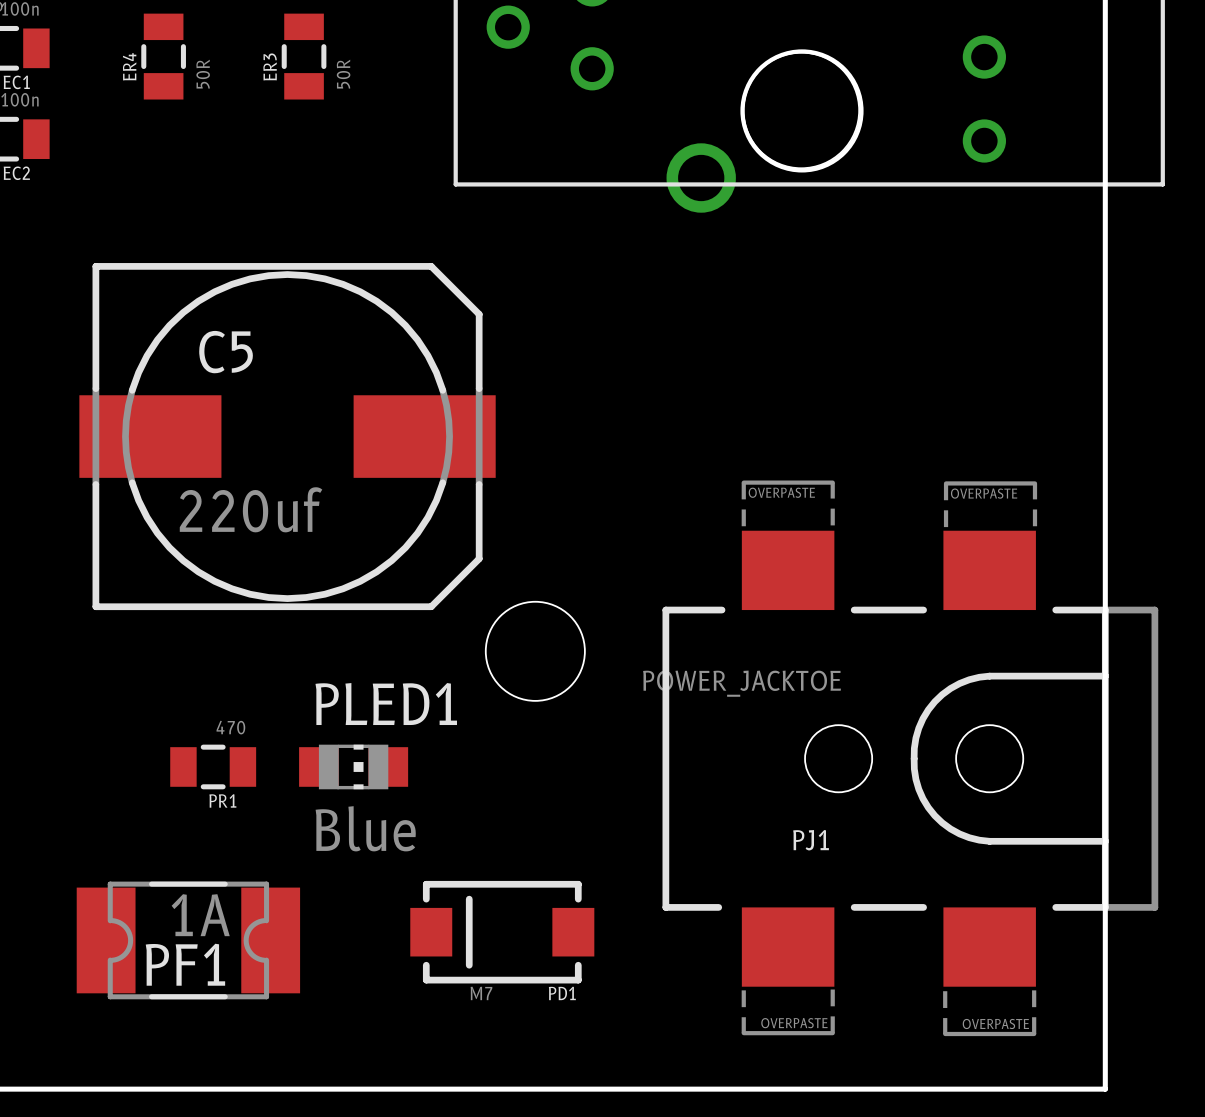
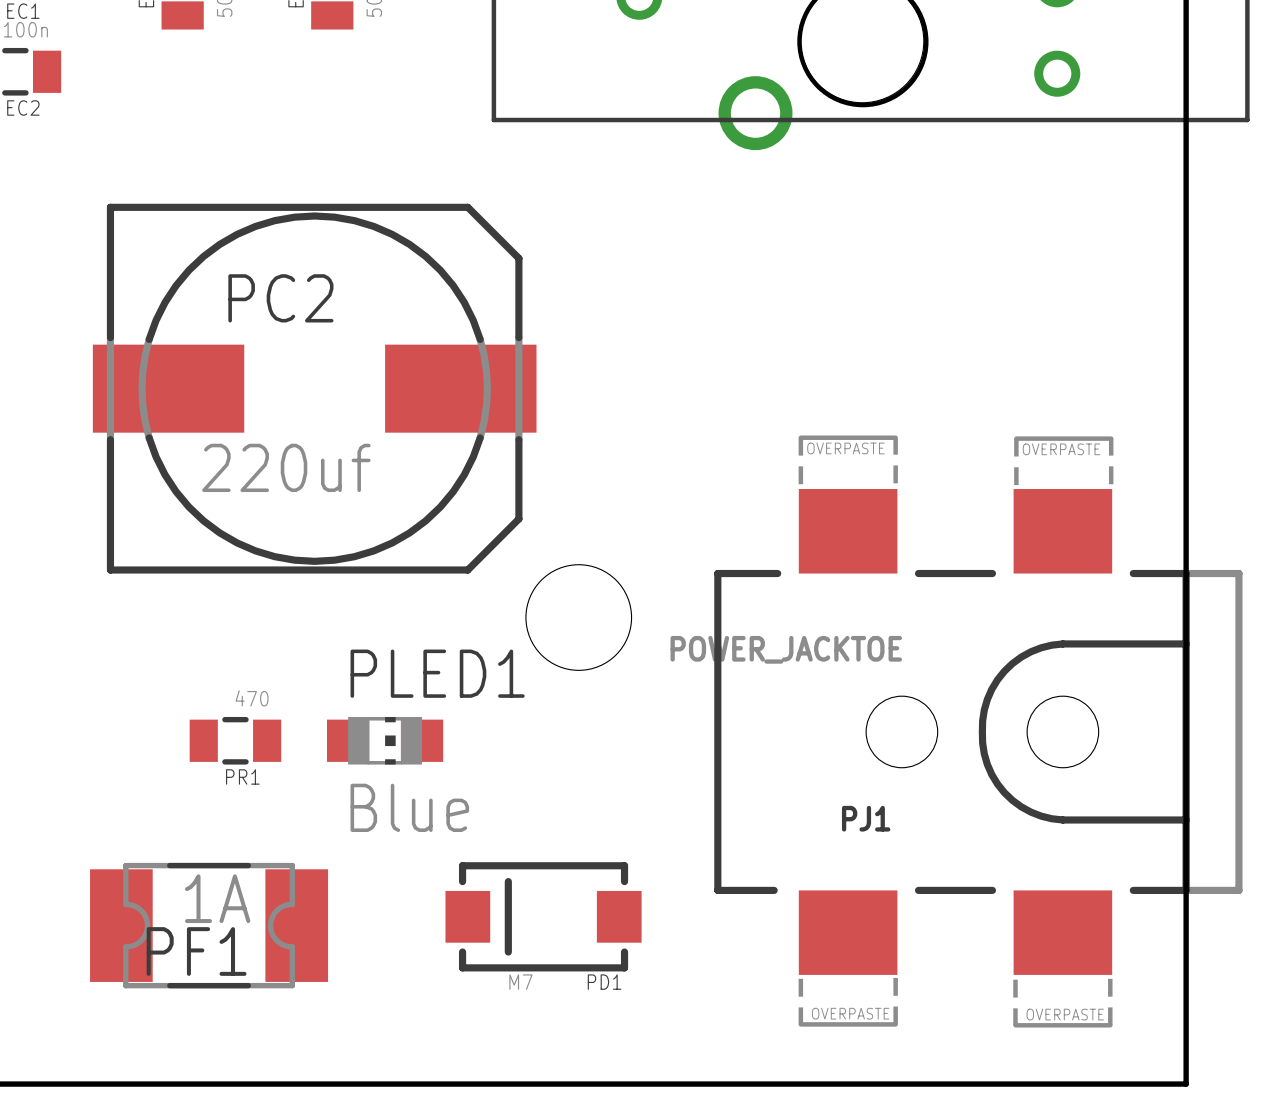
C5 name: C5 (226, 352) -> PC2 (280, 298)

